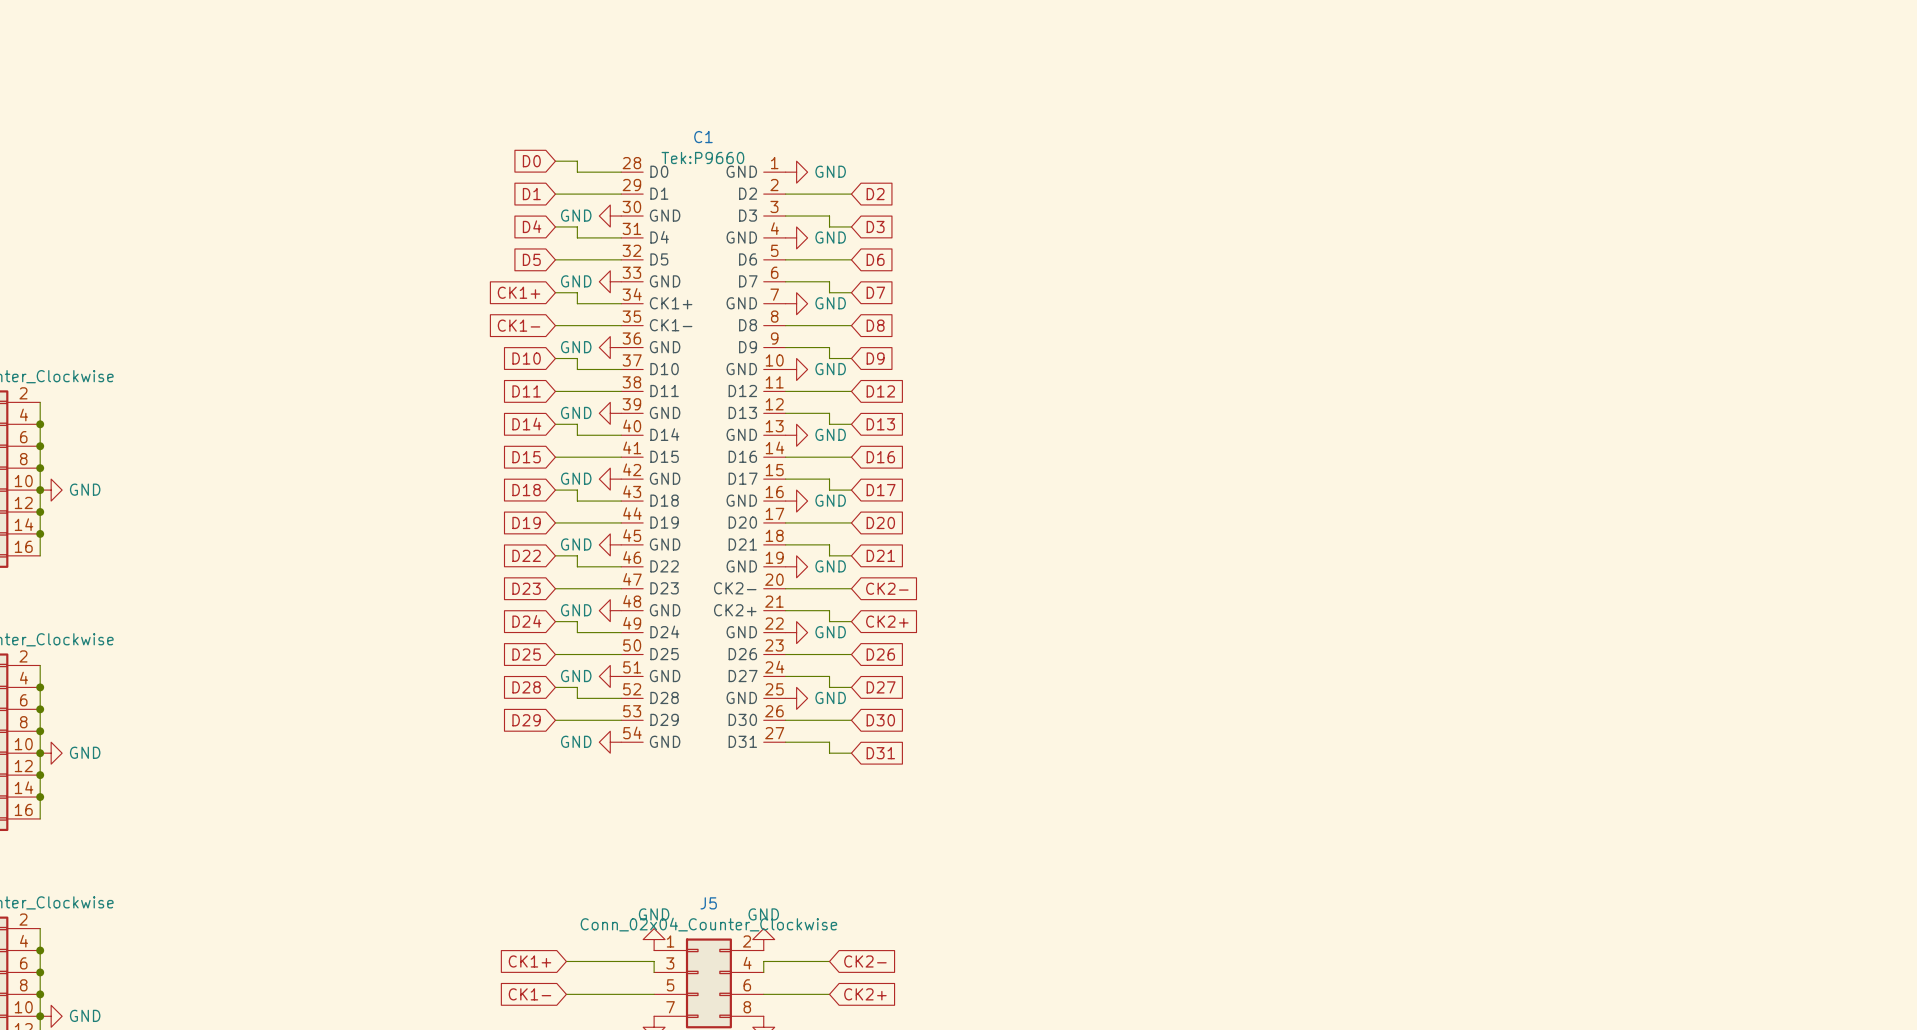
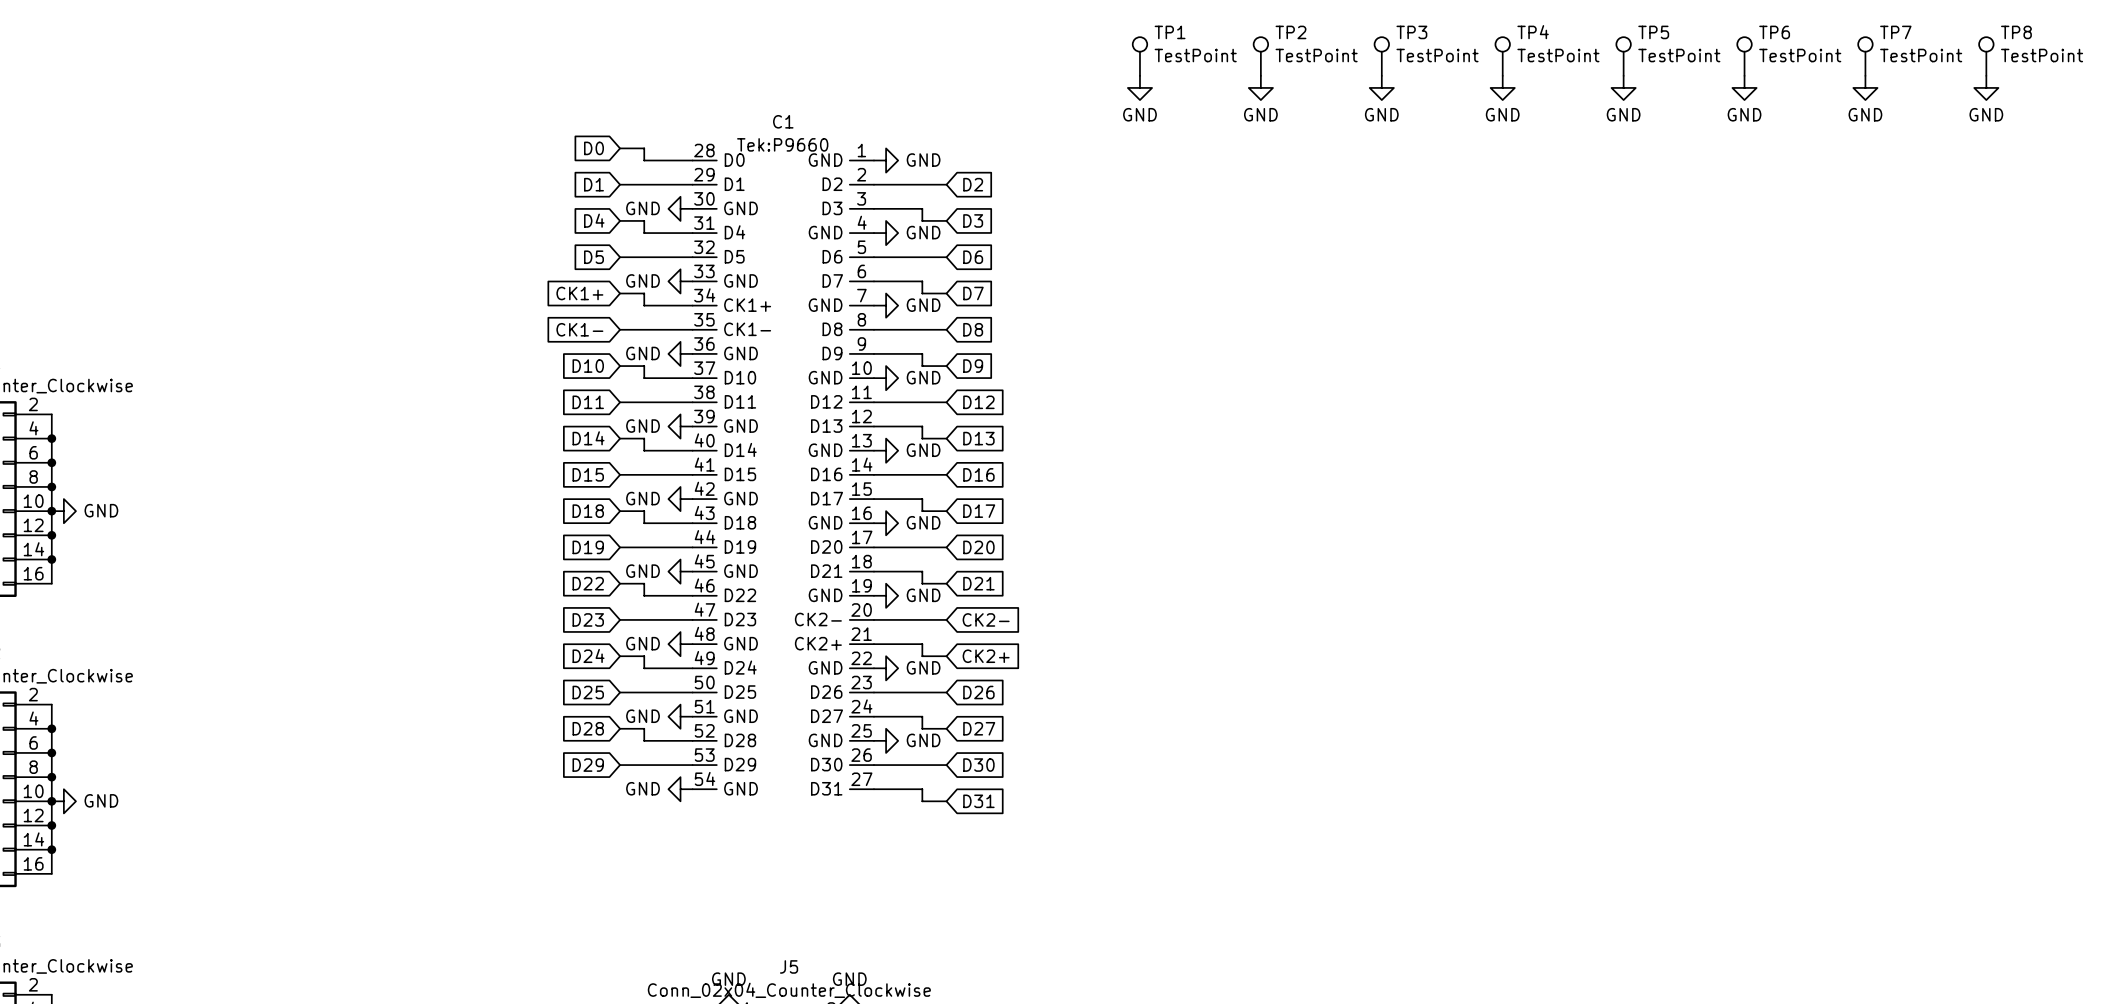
TP1: none -> TestPoint (1139, 56)
TP2: none -> TestPoint (1260, 56)
TP3: none -> TestPoint (1381, 56)
TP4: none -> TestPoint (1502, 56)
TP5: none -> TestPoint (1623, 56)
TP6: none -> TestPoint (1744, 56)
TP7: none -> TestPoint (1865, 56)
TP8: none -> TestPoint (1986, 56)
power symbol: none -> GND (1139, 87)
power symbol: none -> GND (1260, 87)
power symbol: none -> GND (1381, 87)
power symbol: none -> GND (1502, 87)
power symbol: none -> GND (1623, 87)
power symbol: none -> GND (1744, 87)
power symbol: none -> GND (1865, 87)
power symbol: none -> GND (1986, 87)

